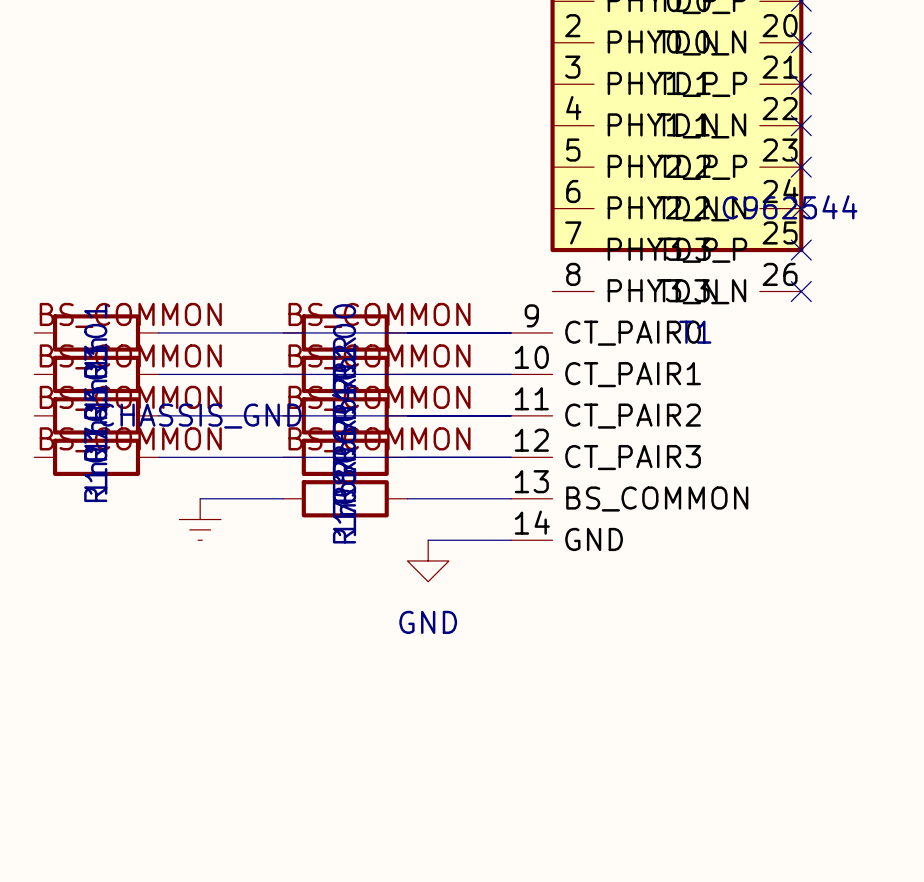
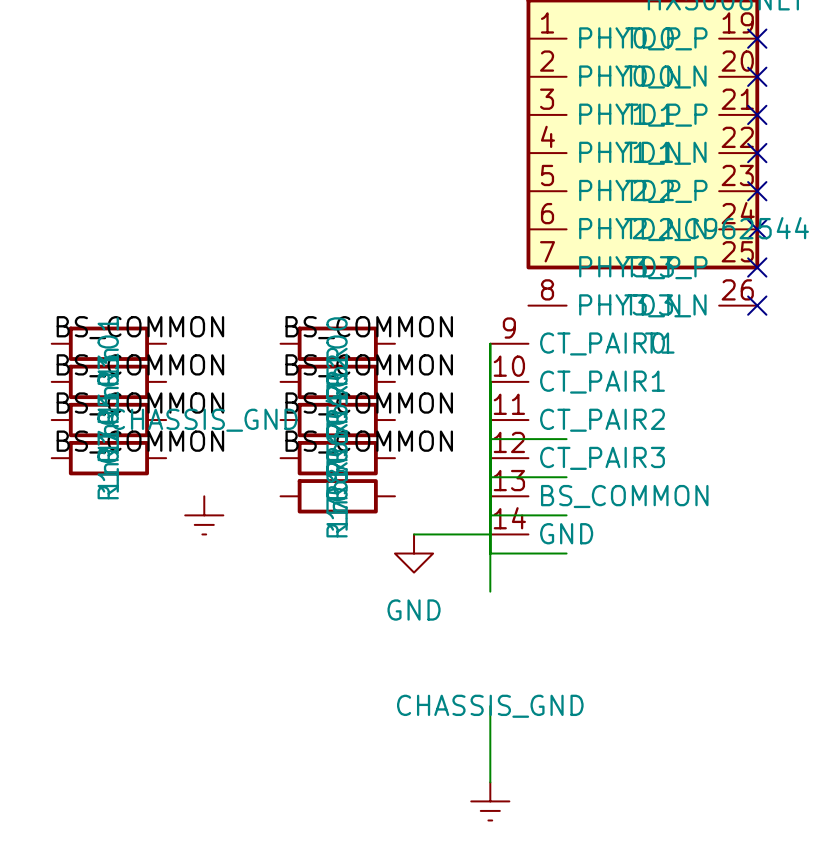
wire: (158, 332) (511, 332) -> (490, 591) (490, 343)
wire: (158, 374) (511, 374) -> none
wire: (158, 415) (511, 415) -> none
wire: none -> (490, 439) (566, 439)
wire: (158, 457) (511, 457) -> none
wire: (200, 498) (283, 498) -> (490, 477) (566, 477)
wire: (407, 498) (511, 498) -> none
wire: none -> (490, 515) (566, 515)
wire: none -> (490, 553) (566, 553)
wire: none -> (490, 706) (490, 782)
power symbol: none -> CHASSIS_GND (490, 801)

